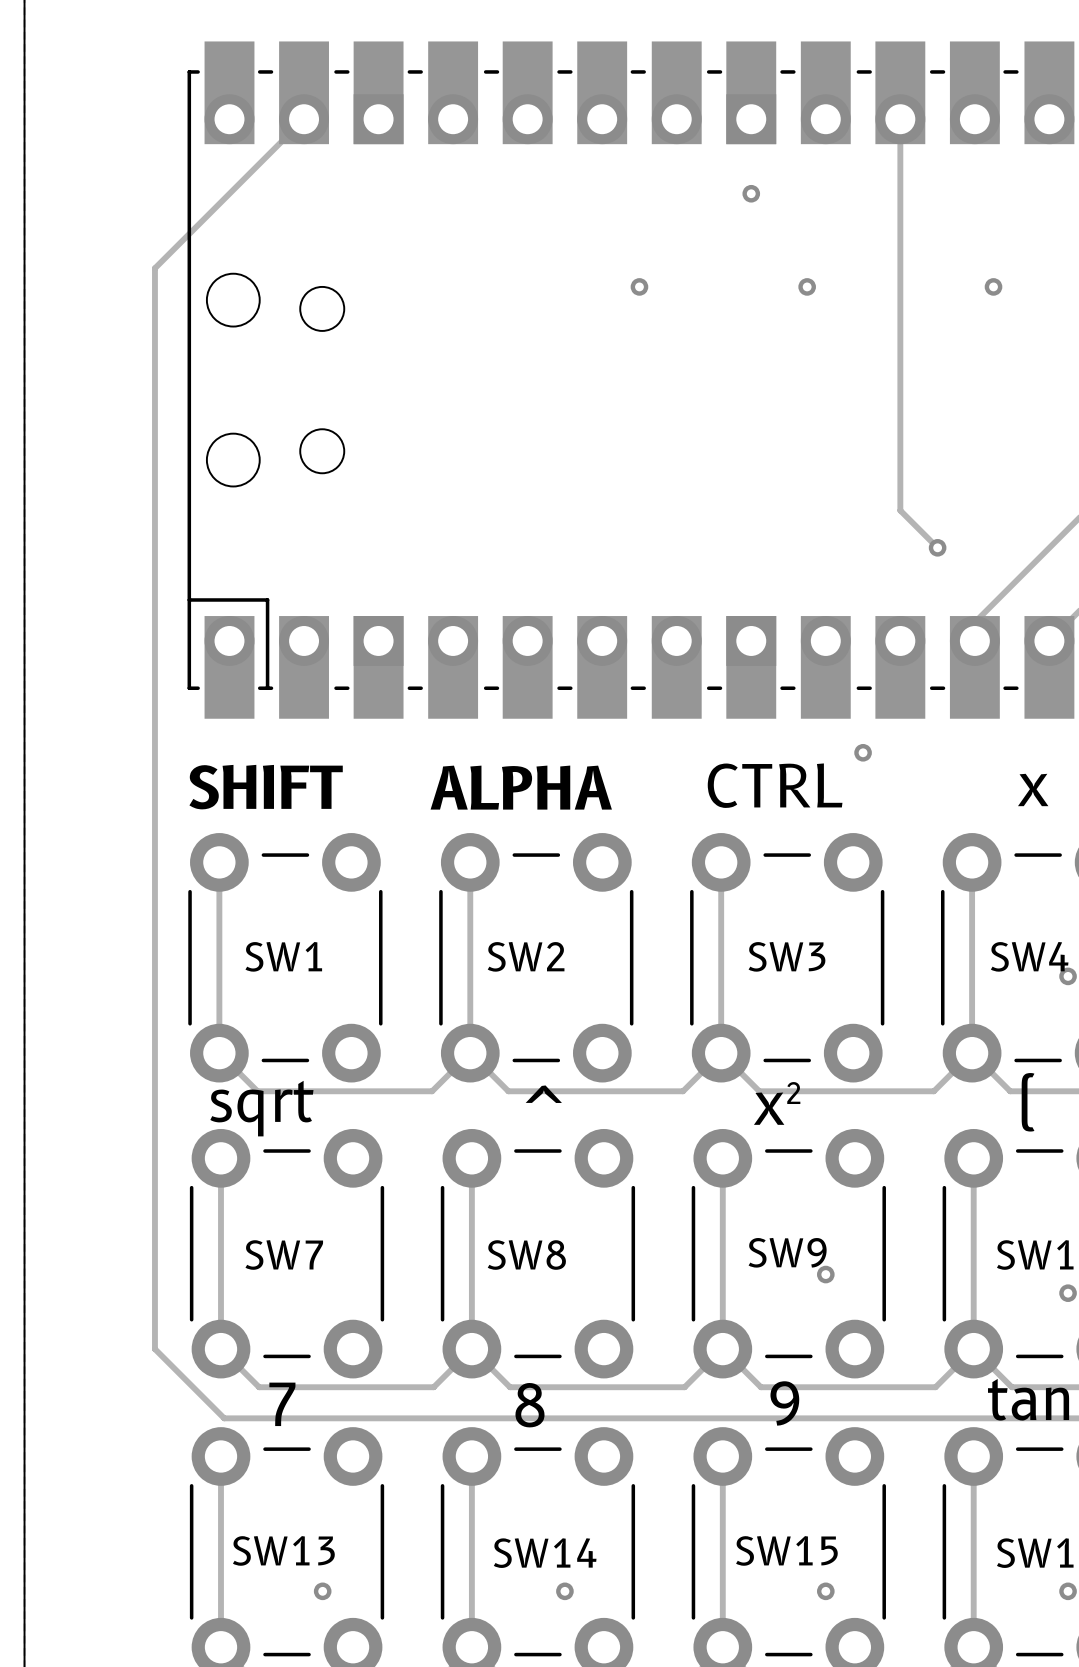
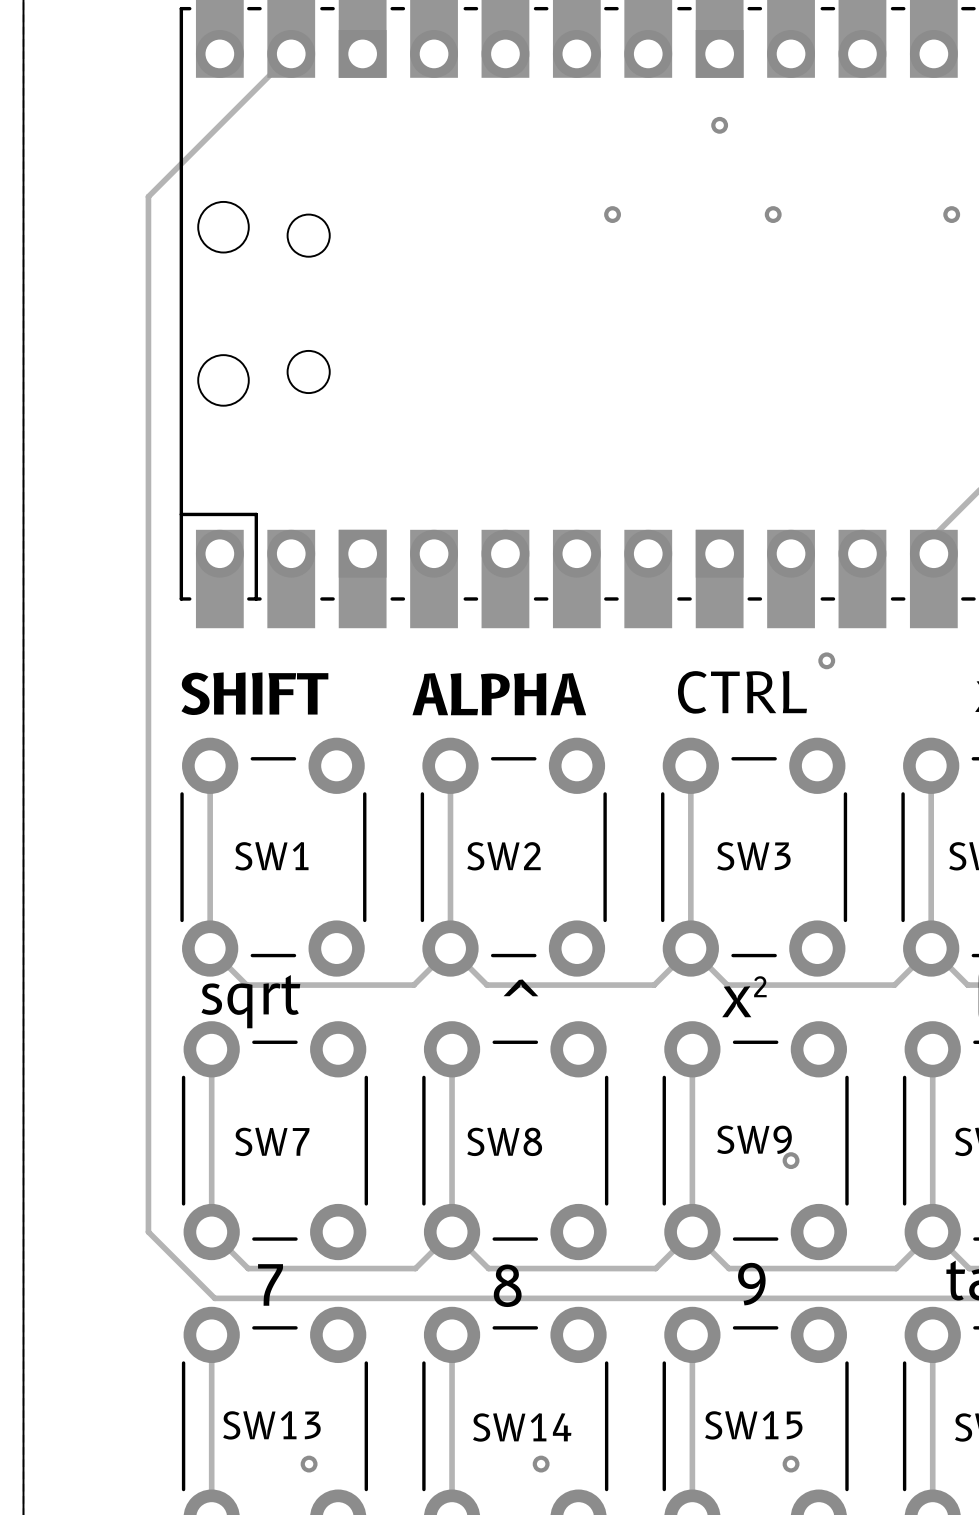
track: (900, 119) (900, 510) (937, 547) -> none
via: (937, 547) -> none

